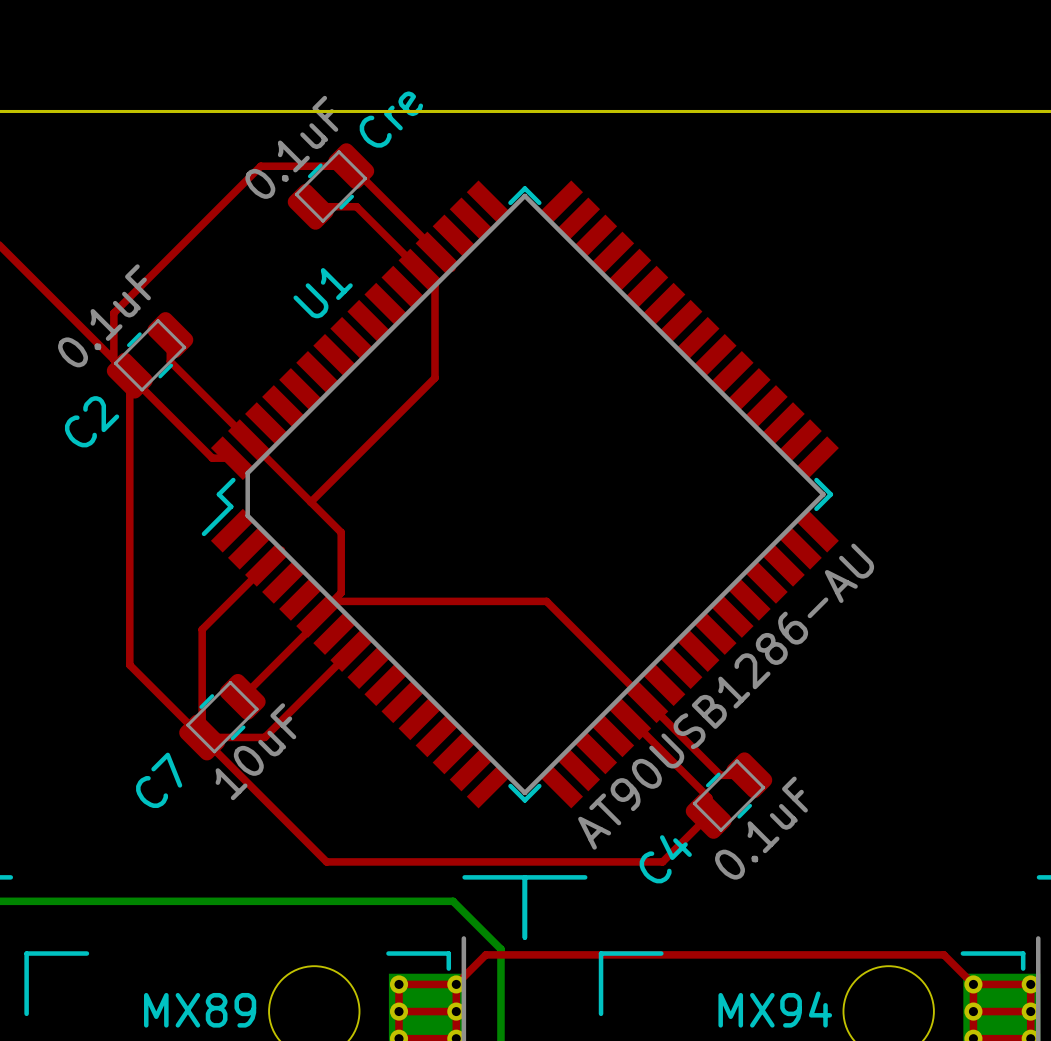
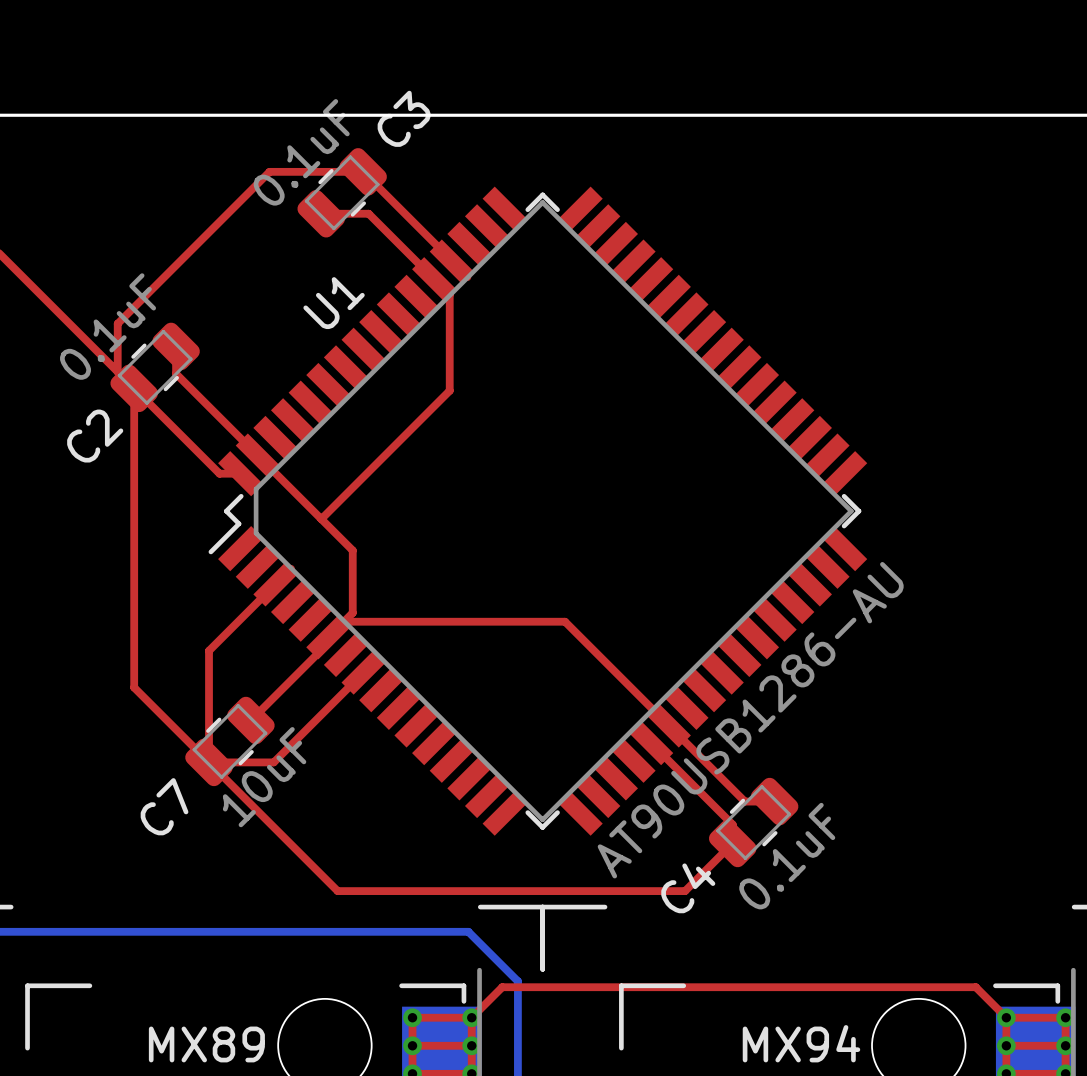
Cre name: Cre (391, 119) -> C3 (404, 118)

